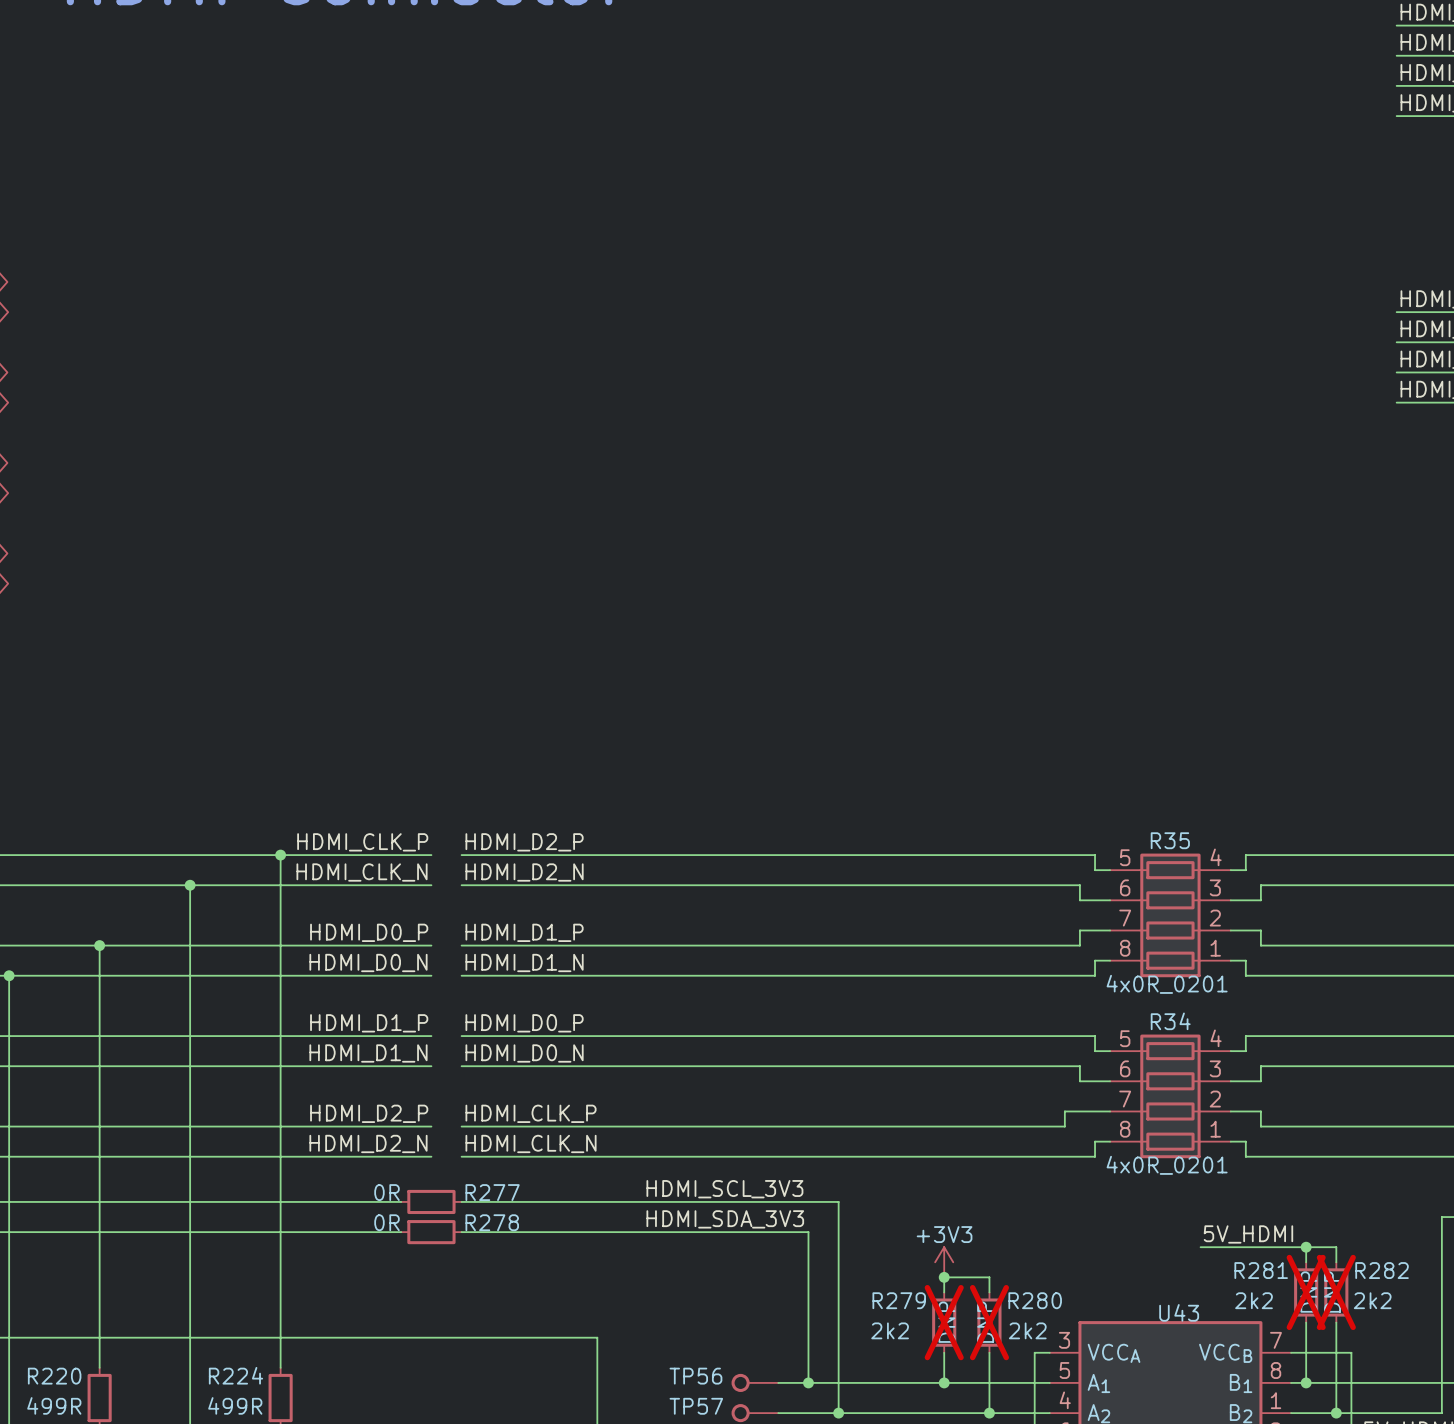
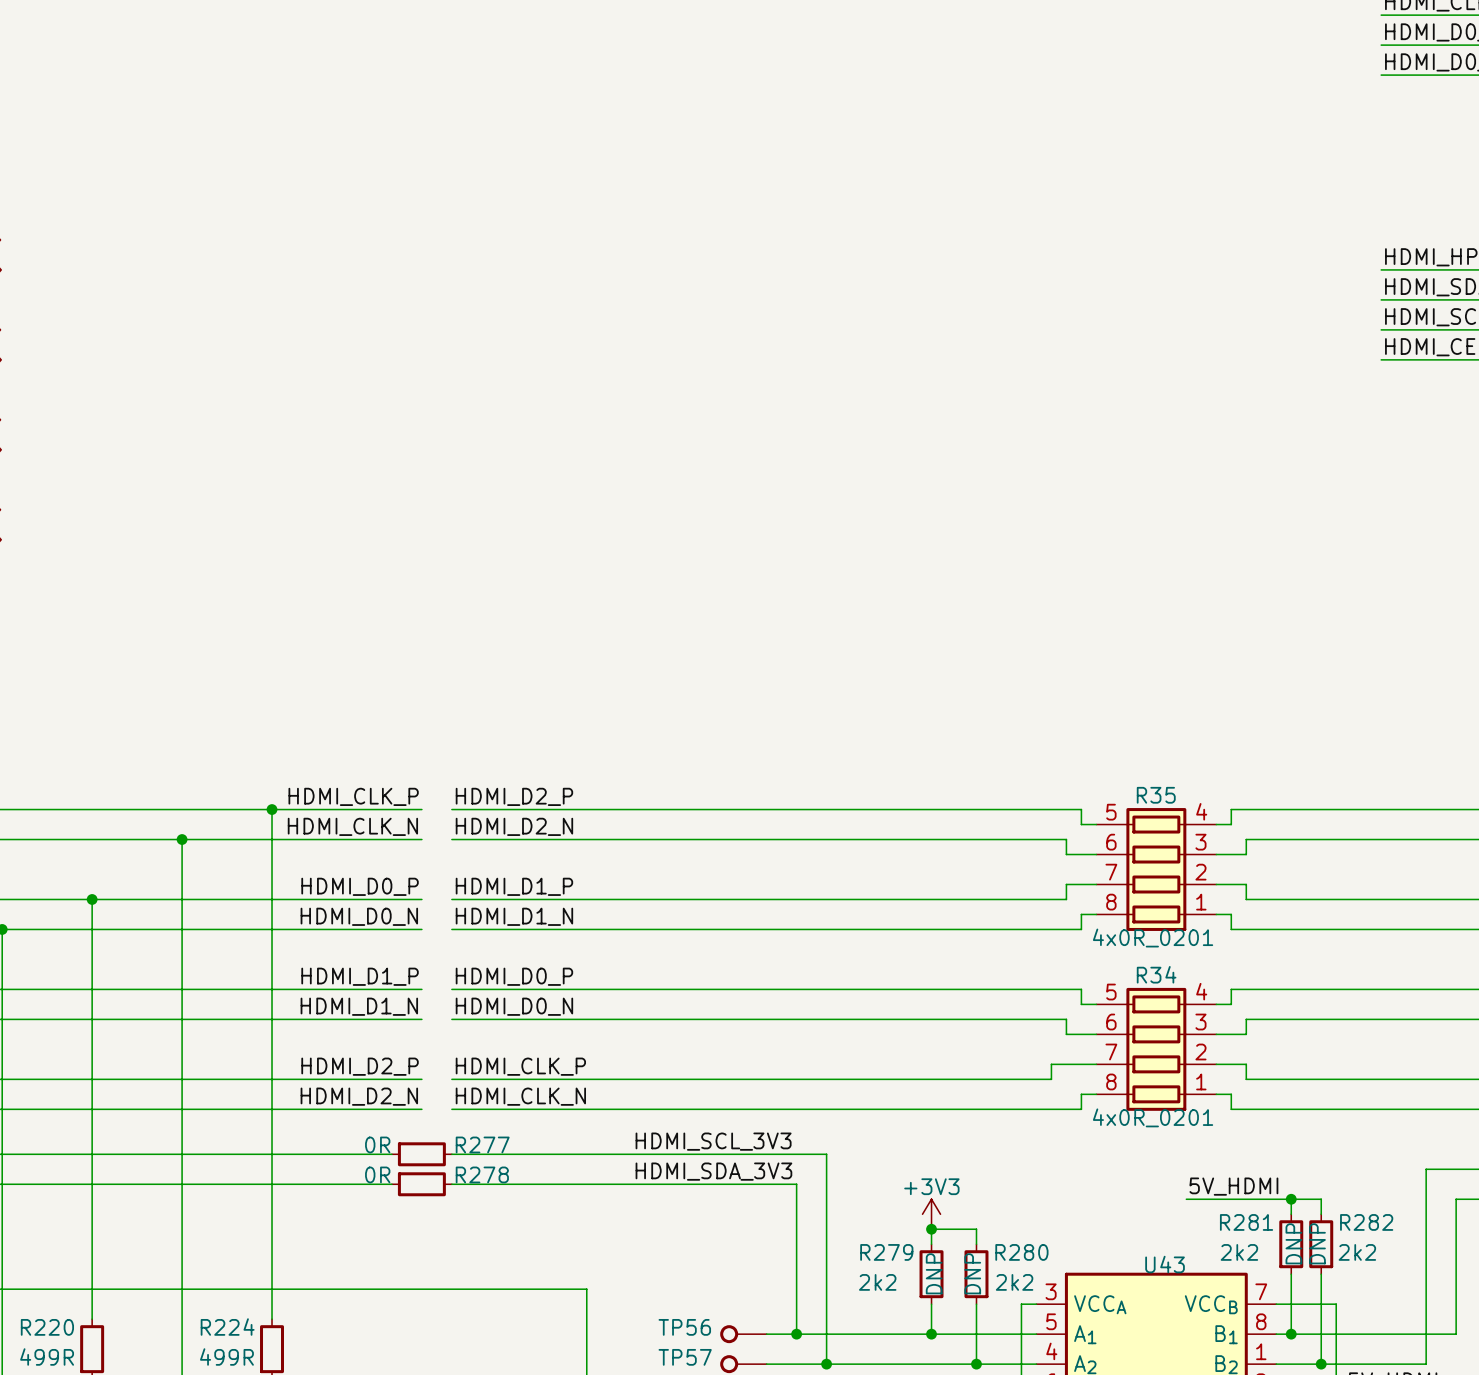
R281 do-not-place cross: (1306, 1292) -> none
R282 do-not-place cross: (1336, 1292) -> none
R279 do-not-place cross: (944, 1322) -> none
R280 do-not-place cross: (989, 1322) -> none

